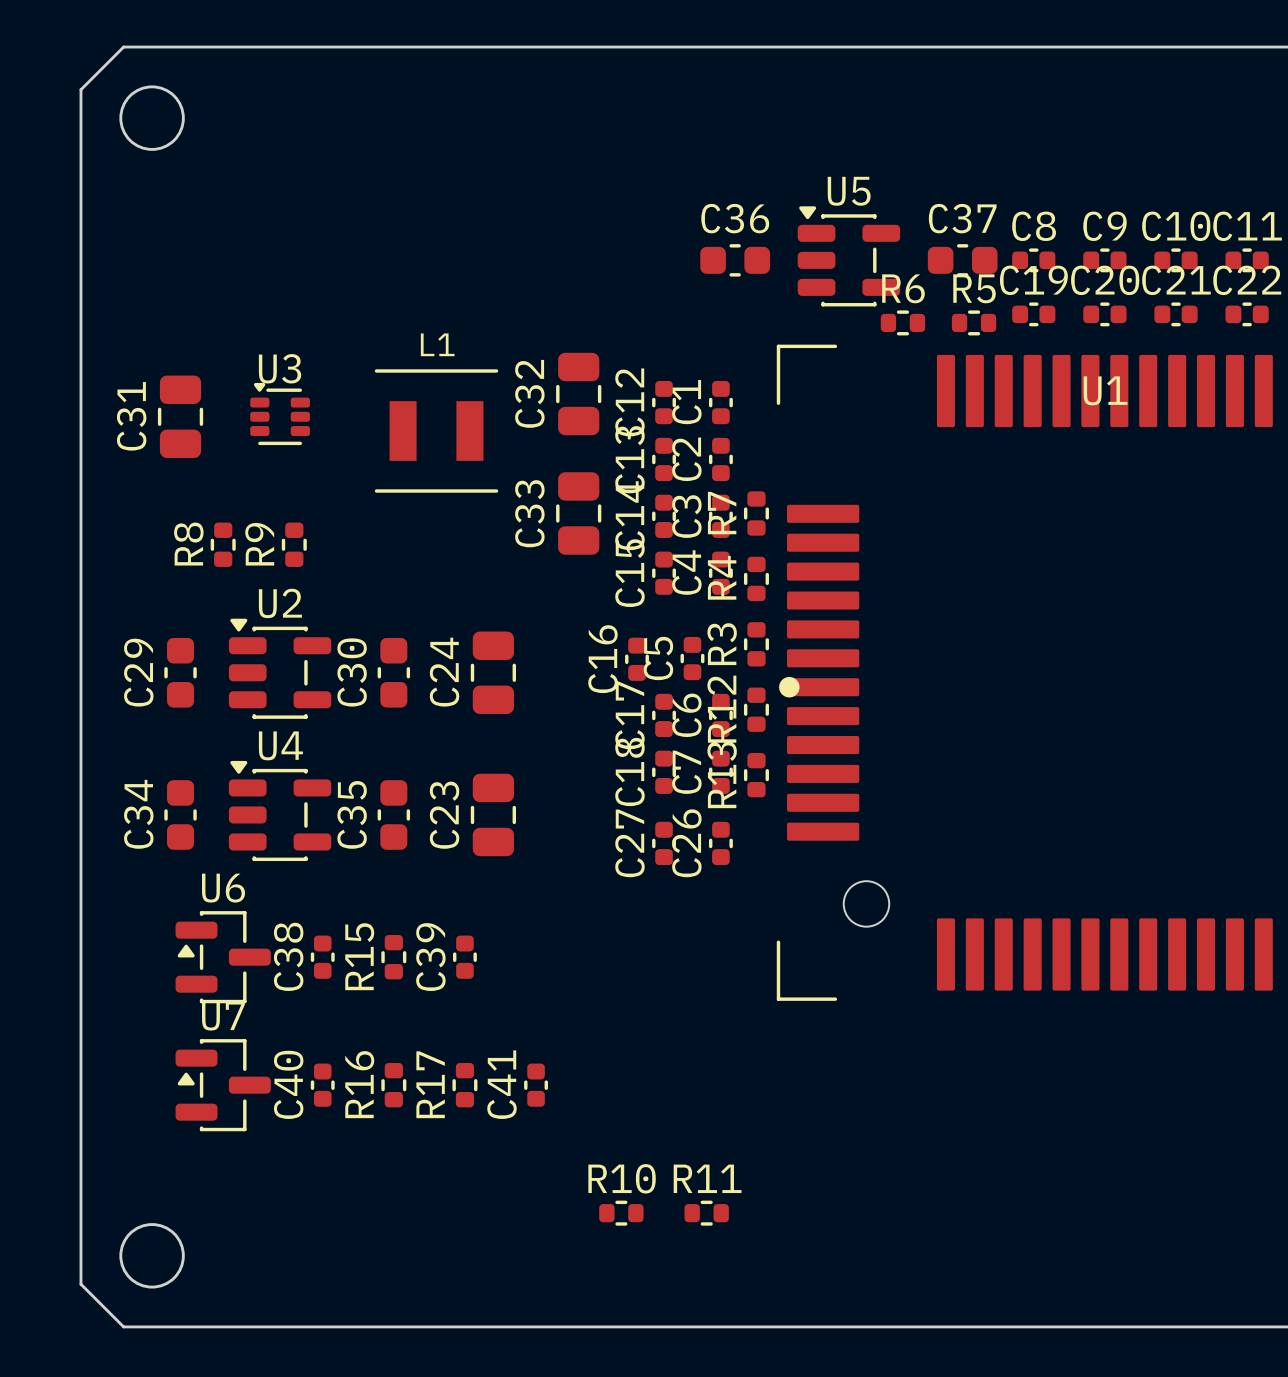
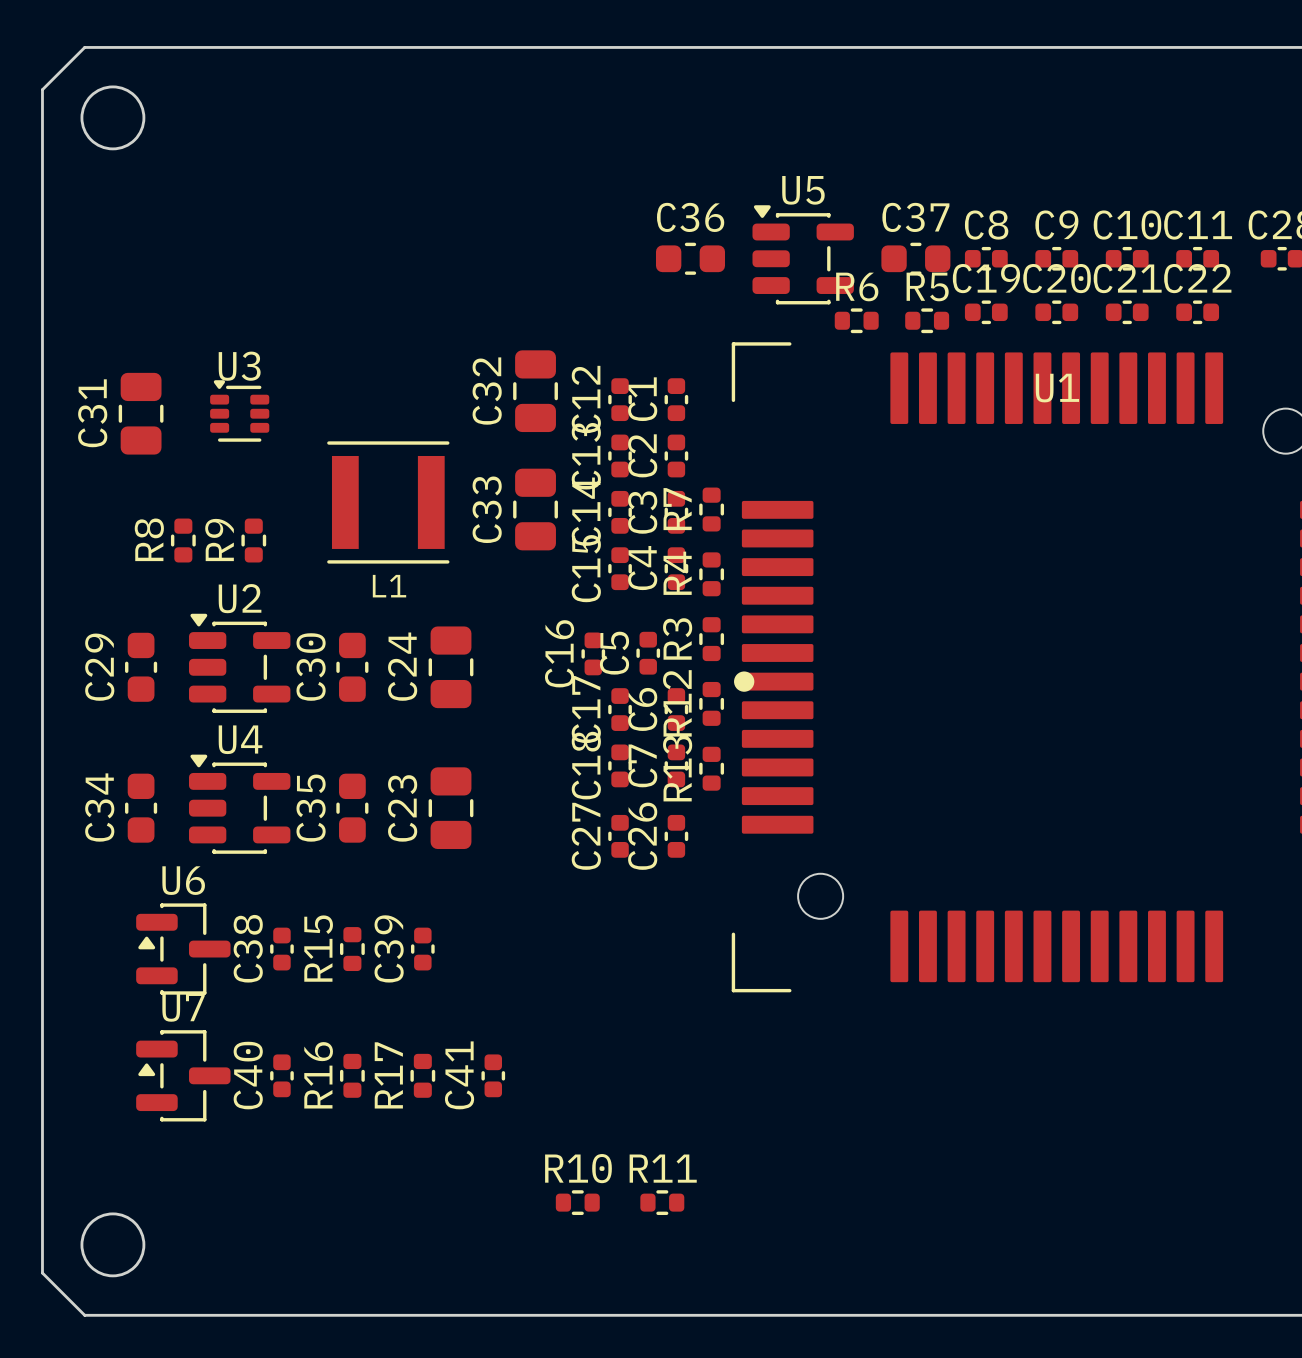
L1 name position: L1 (437, 344) -> L1 (389, 586)
L1 footprint: [374, 369, 499, 493] -> [327, 441, 450, 564]

